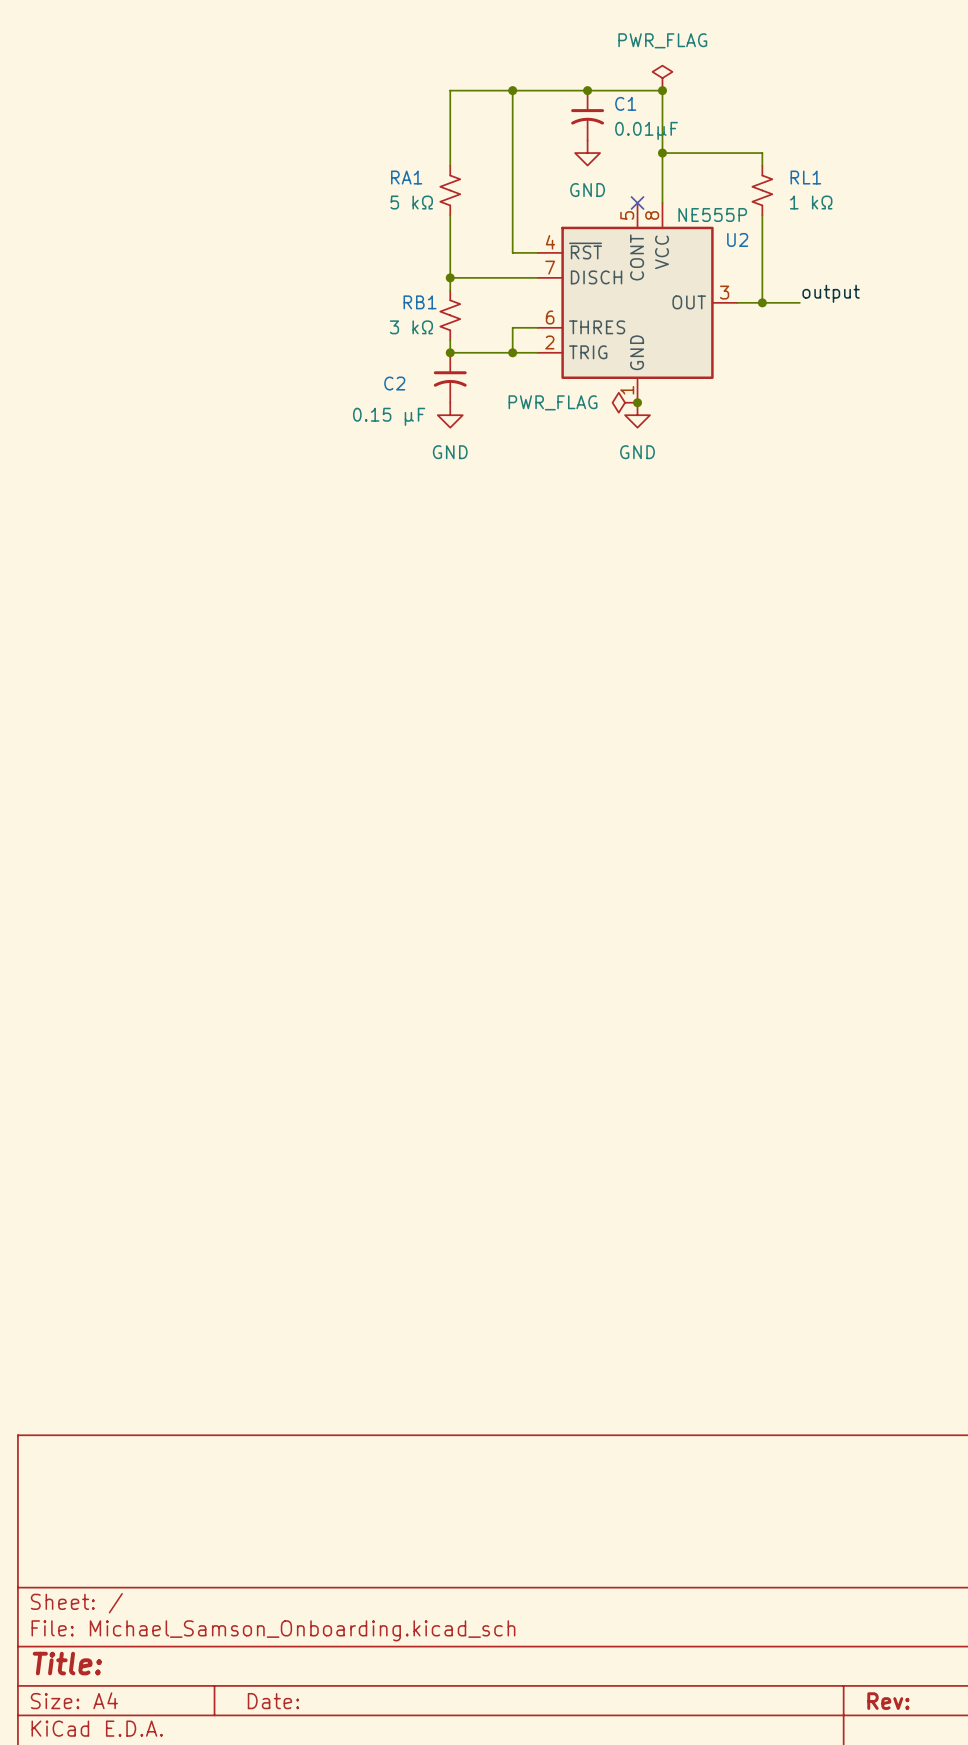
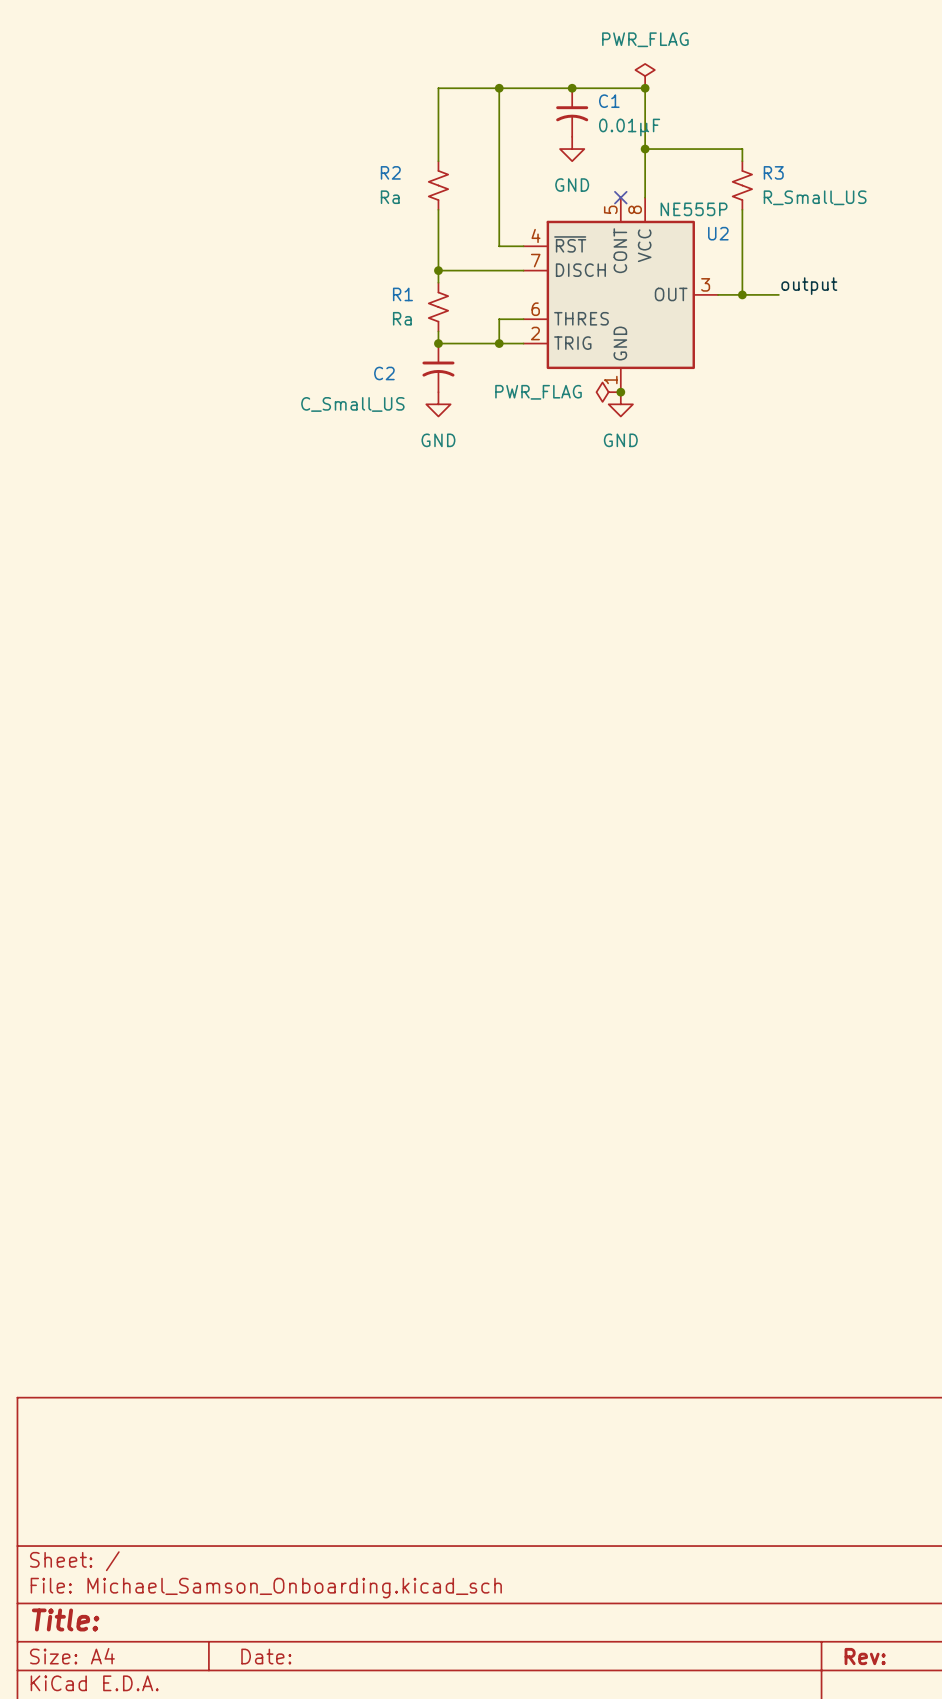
RA1 name: RA1 (406, 177) -> R2 (390, 172)
RL1 name: RL1 (805, 177) -> R3 (773, 172)
RA1 value: 5 kΩ (411, 202) -> Ra (390, 197)
RL1 value: 1 kΩ (811, 202) -> R_Small_US (815, 197)
RB1 name: RB1 (420, 302) -> R1 (402, 294)
RB1 value: 3 kΩ (411, 327) -> Ra (402, 318)
C2 value: 0.15 µF (389, 416) -> C_Small_US (352, 404)

